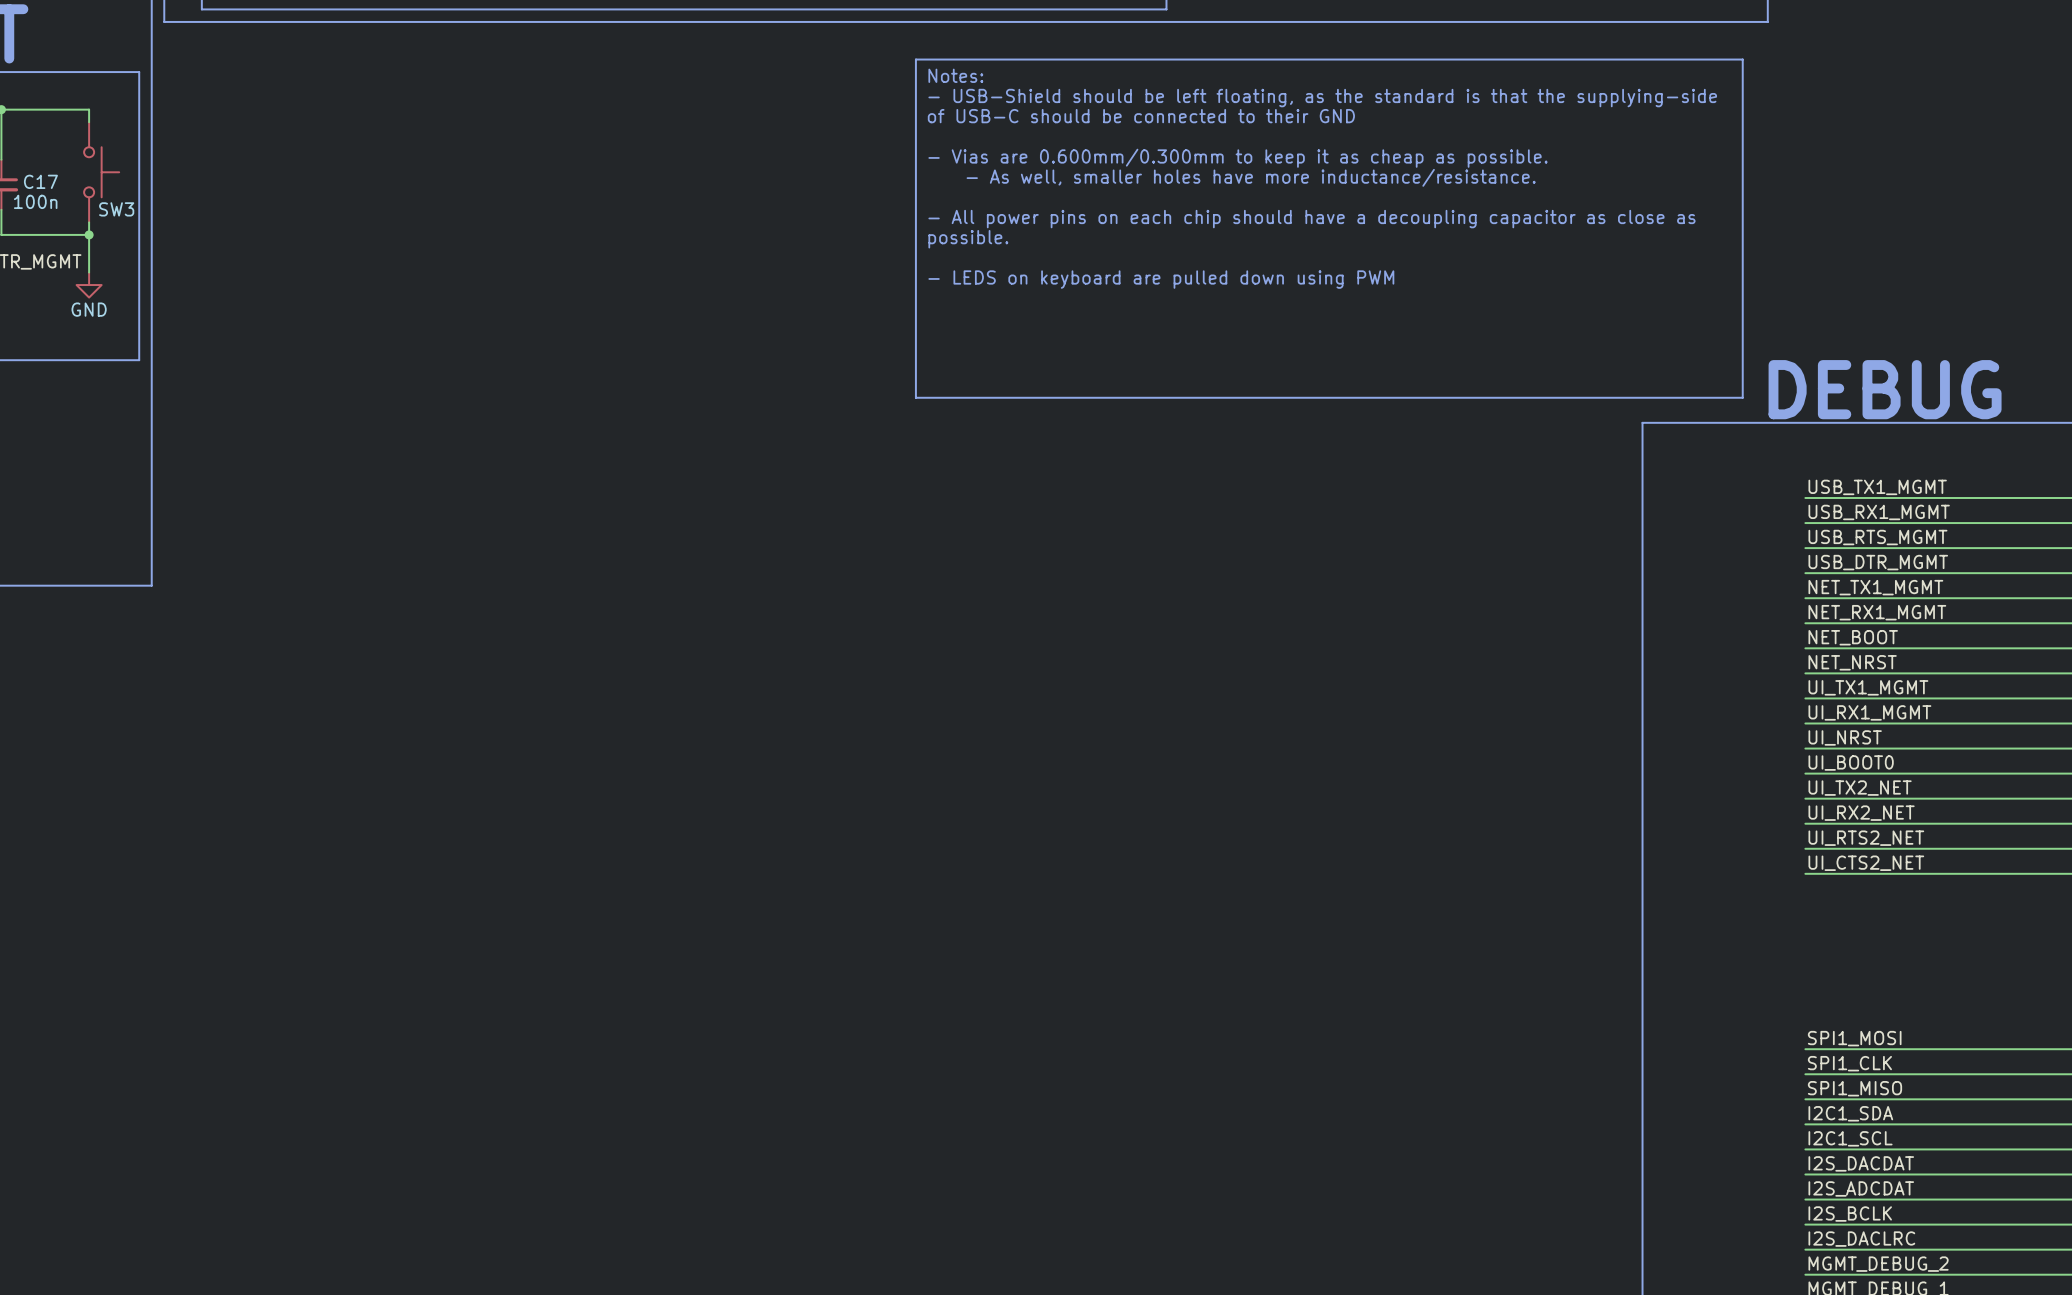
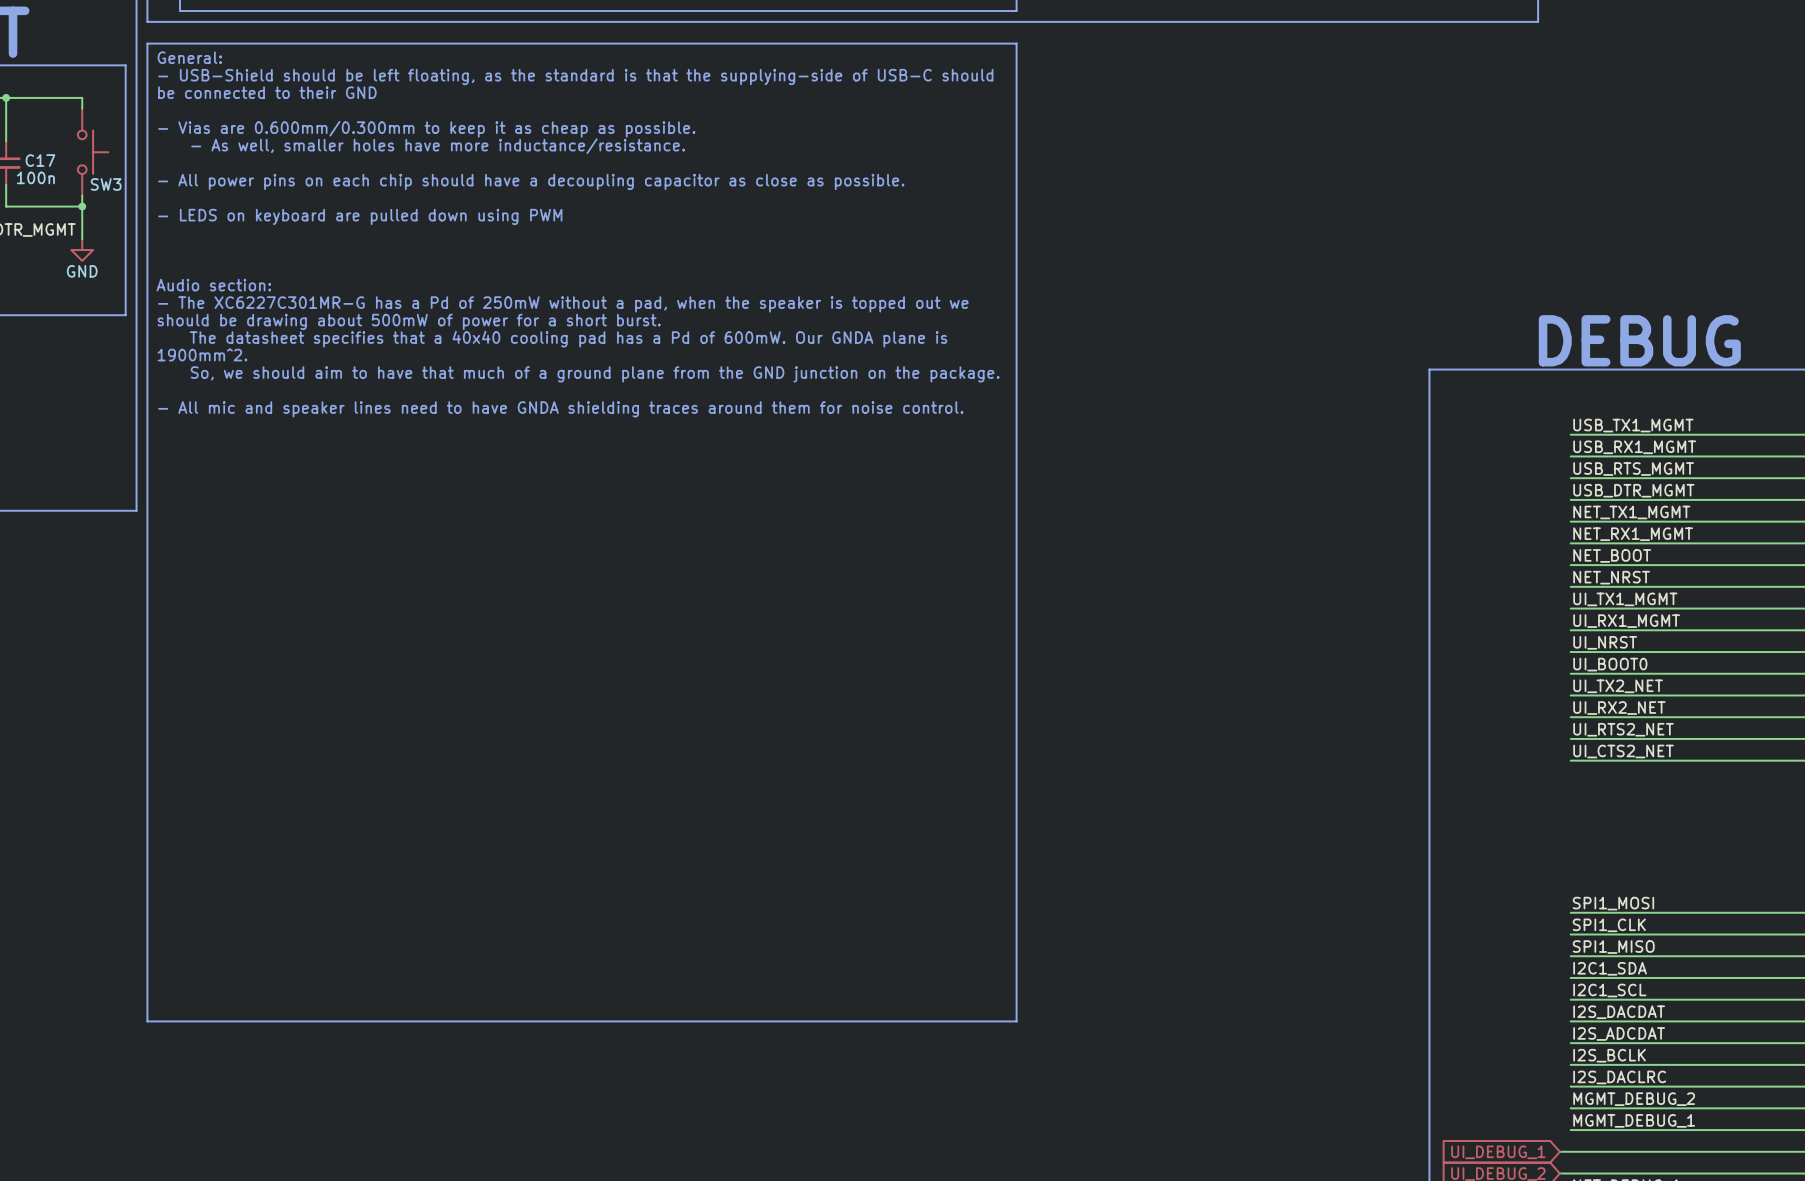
line: none -> (147, 43) (1016, 43) (1016, 1021) (147, 1021) (147, 43)
line: (915, 59) (1742, 59) (1742, 397) (915, 397) (915, 59) -> none
text: none -> General: (189, 57)
text: Notes: (955, 75) -> none
text: none -> - USB-Shield should be left floating, as the standard is that the supplying-side of USB-C should (575, 77)
text: - USB-Shield should be left floating, as the standard is that the supplying-side (1322, 98) -> none
text: none -> be connected to their GND (267, 92)
text: of USB-C should be connected to their GND (1141, 116) -> none
text: none -> - Vias are 0.600mm/0.300mm to keep it as cheap as possible. (426, 129)
text: - Vias are 0.600mm/0.300mm to keep it as cheap as possible. (1238, 158) -> none
text: none -> - As well, smaller holes have more inductance/resistance. (438, 146)
text: - As well, smaller holes have more inductance/resistance. (1251, 177) -> none
text: none -> - All power pins on each chip should have a decoupling capacitor as close as possible. (531, 181)
text: - All power pins on each chip should have a decoupling capacitor as close as (1311, 219) -> none
text: possible. (968, 239) -> none
text: none -> - LEDS on keyboard are pulled down using PWM (360, 216)
text: - LEDS on keyboard are pulled down using PWM (1161, 279) -> none
text: none -> Audio section: (213, 285)
text: none -> - The XC6227C301MR-G has a Pd of 250mW without a pad, when the speaker is topped out we (563, 304)
text: none -> should be drawing about 500mW of power for a short burst. (409, 321)
text: none -> The datasheet specifies that a 40x40 cooling pad has a Pd of 600mW. Our GNDA plane is (568, 339)
text: none -> 1900mm^2. (202, 354)
text: none -> So, we should aim to have that much of a ground plane from the GND junction on the package. (595, 374)
text: none -> - All mic and speaker lines need to have GNDA shielding traces around them for noise control. (560, 409)

